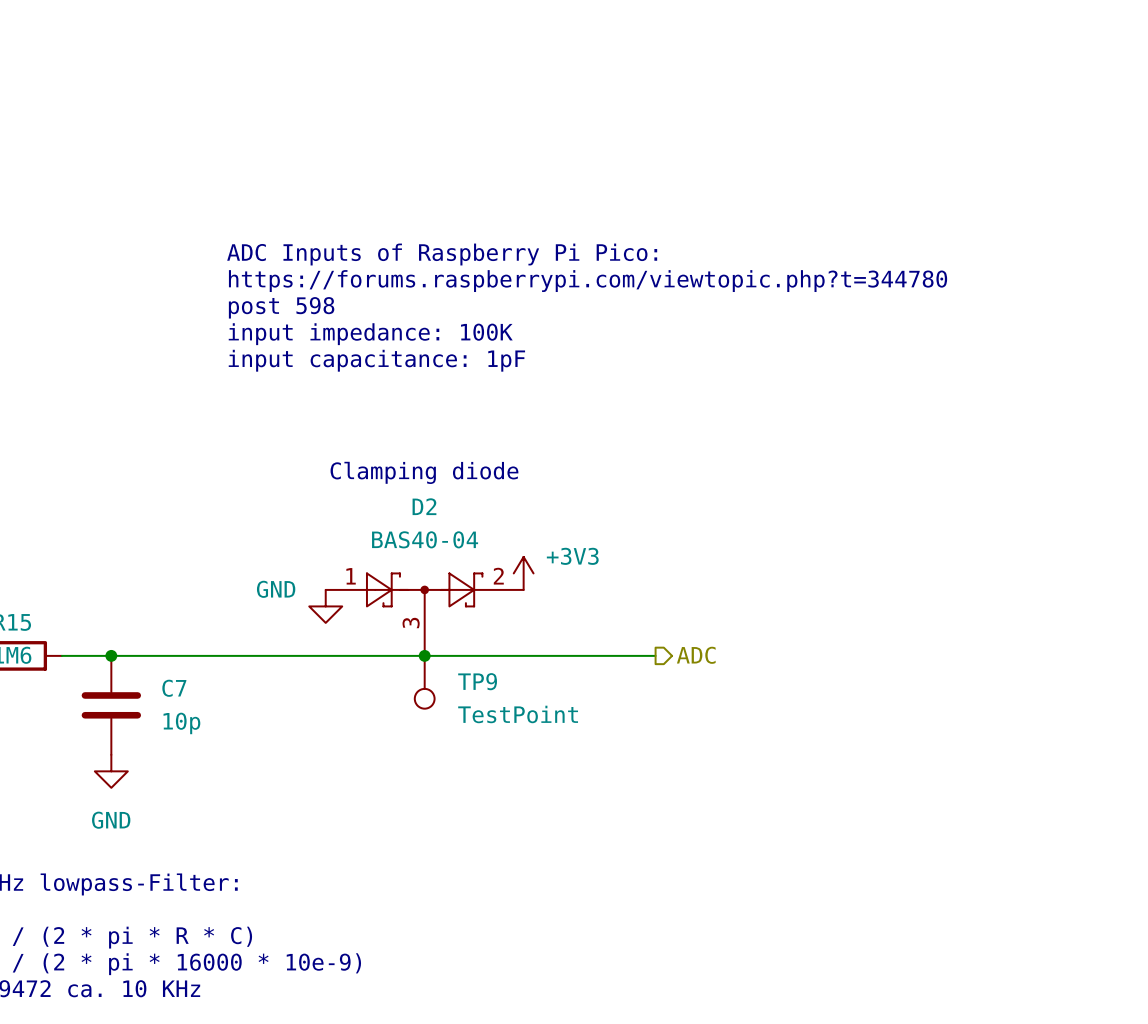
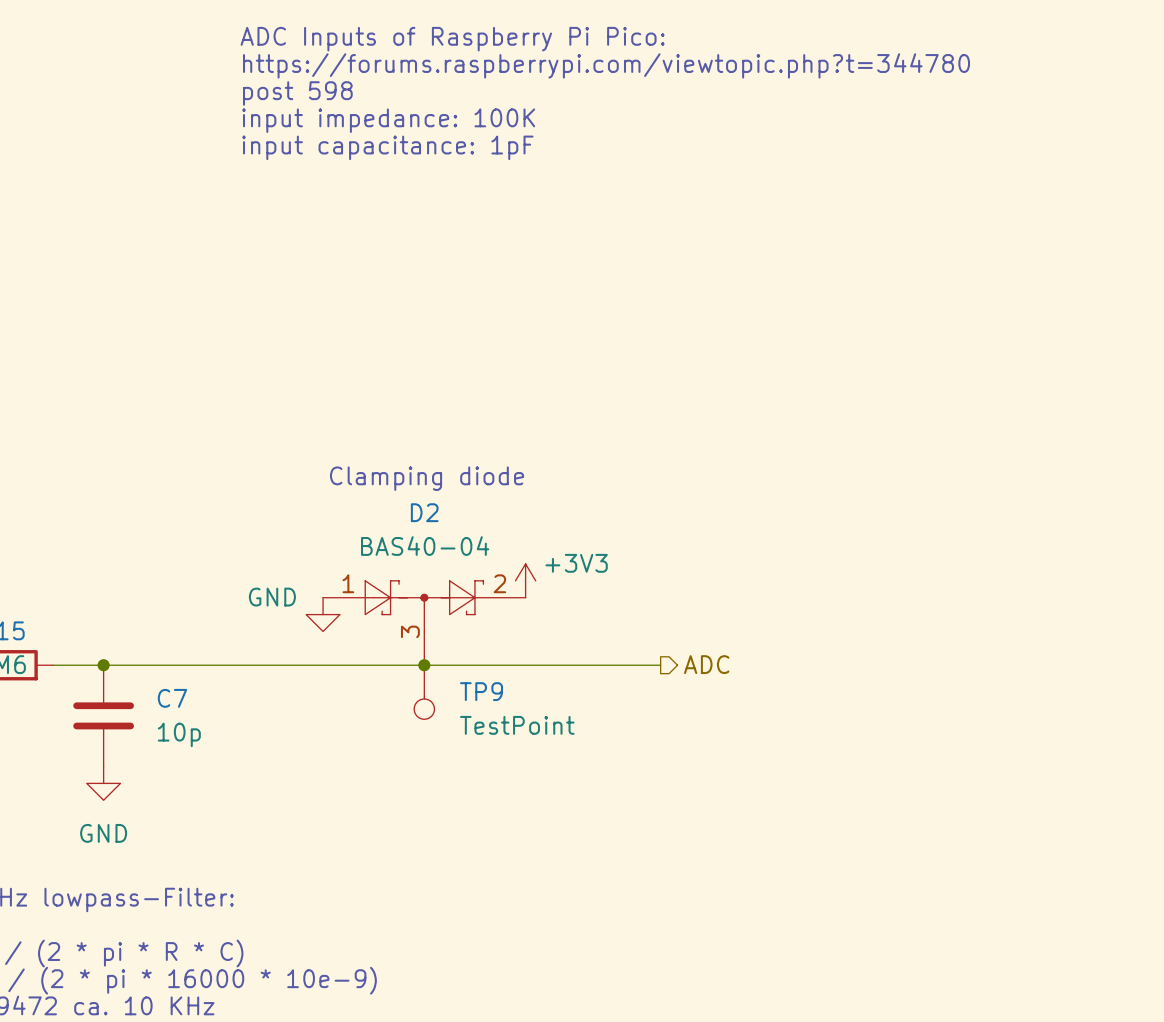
text position: ADC Inputs of Raspberry Pi Pico: (442, 254) -> ADC Inputs of Raspberry Pi Pico: (452, 39)
text position: https://forums.raspberrypi.com/viewtopic.php?t=344780 (588, 281) -> https://forums.raspberrypi.com/viewtopic.php?t=344780 (606, 65)
text position: post 598 (281, 307) -> post 598 (297, 93)
text position: input impedance: 100K (370, 334) -> input impedance: 100K (388, 120)
text position: input capacitance: 1pF (376, 360) -> input capacitance: 1pF (387, 147)

